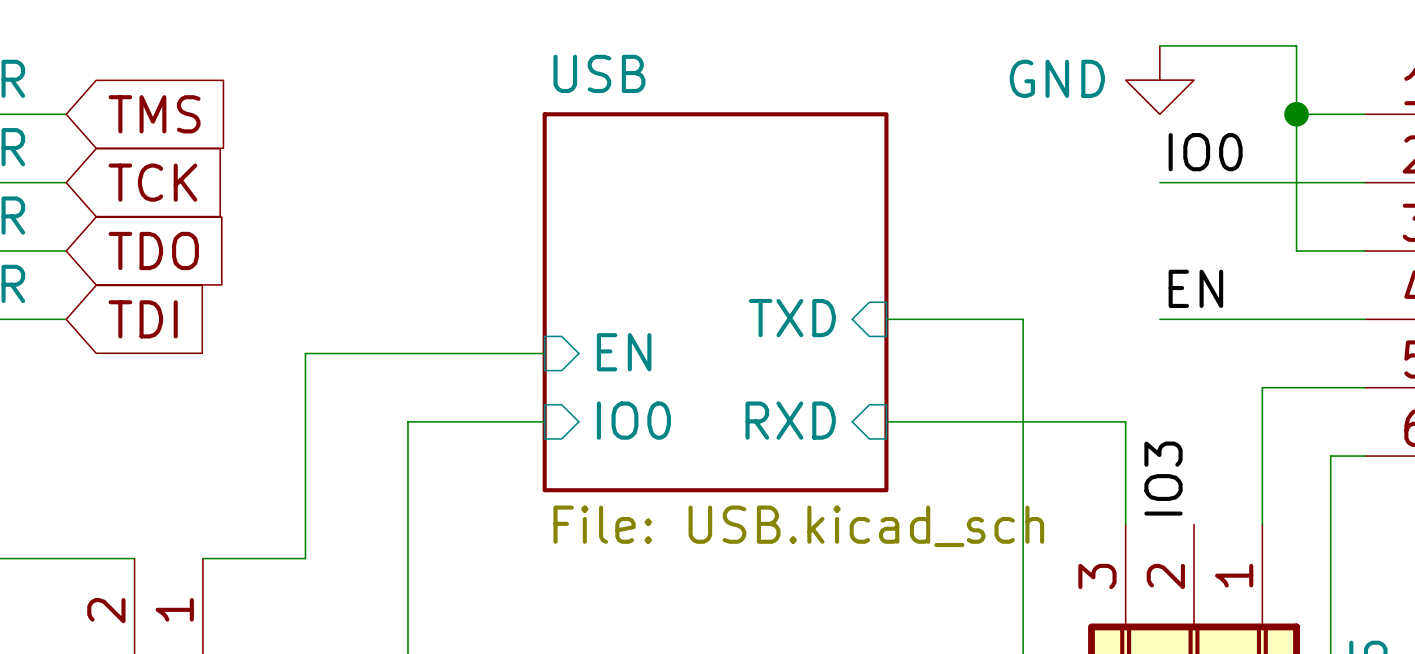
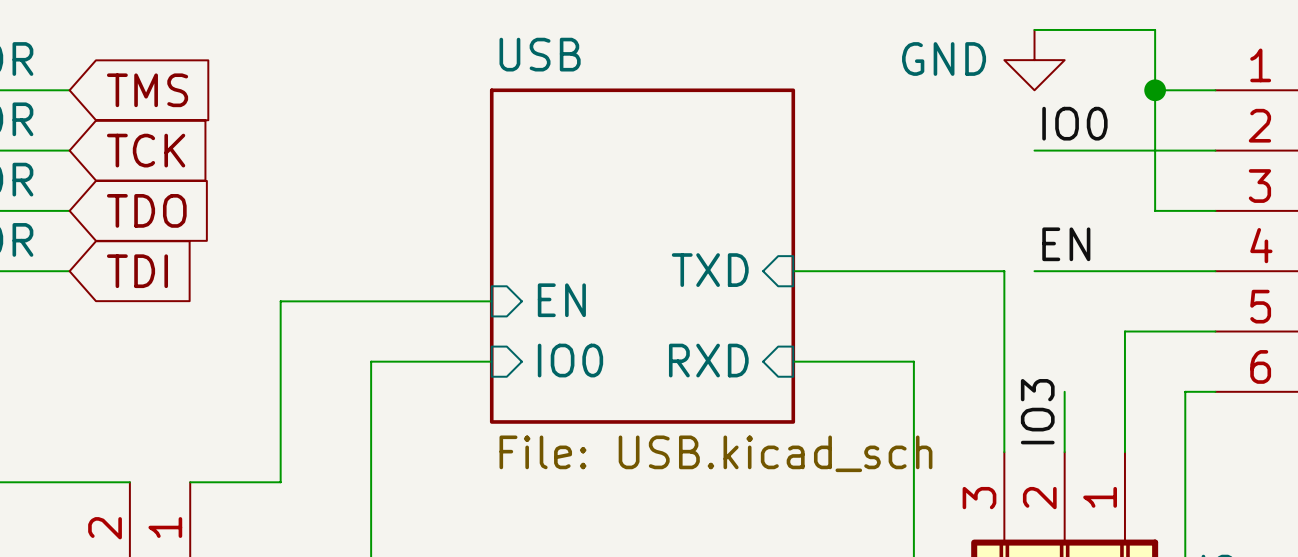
wire: (1023, 319) (1023, 421) (1125, 421) -> (913, 271) (1004, 271) (1004, 361)
wire: none -> (1064, 391) (1064, 452)

